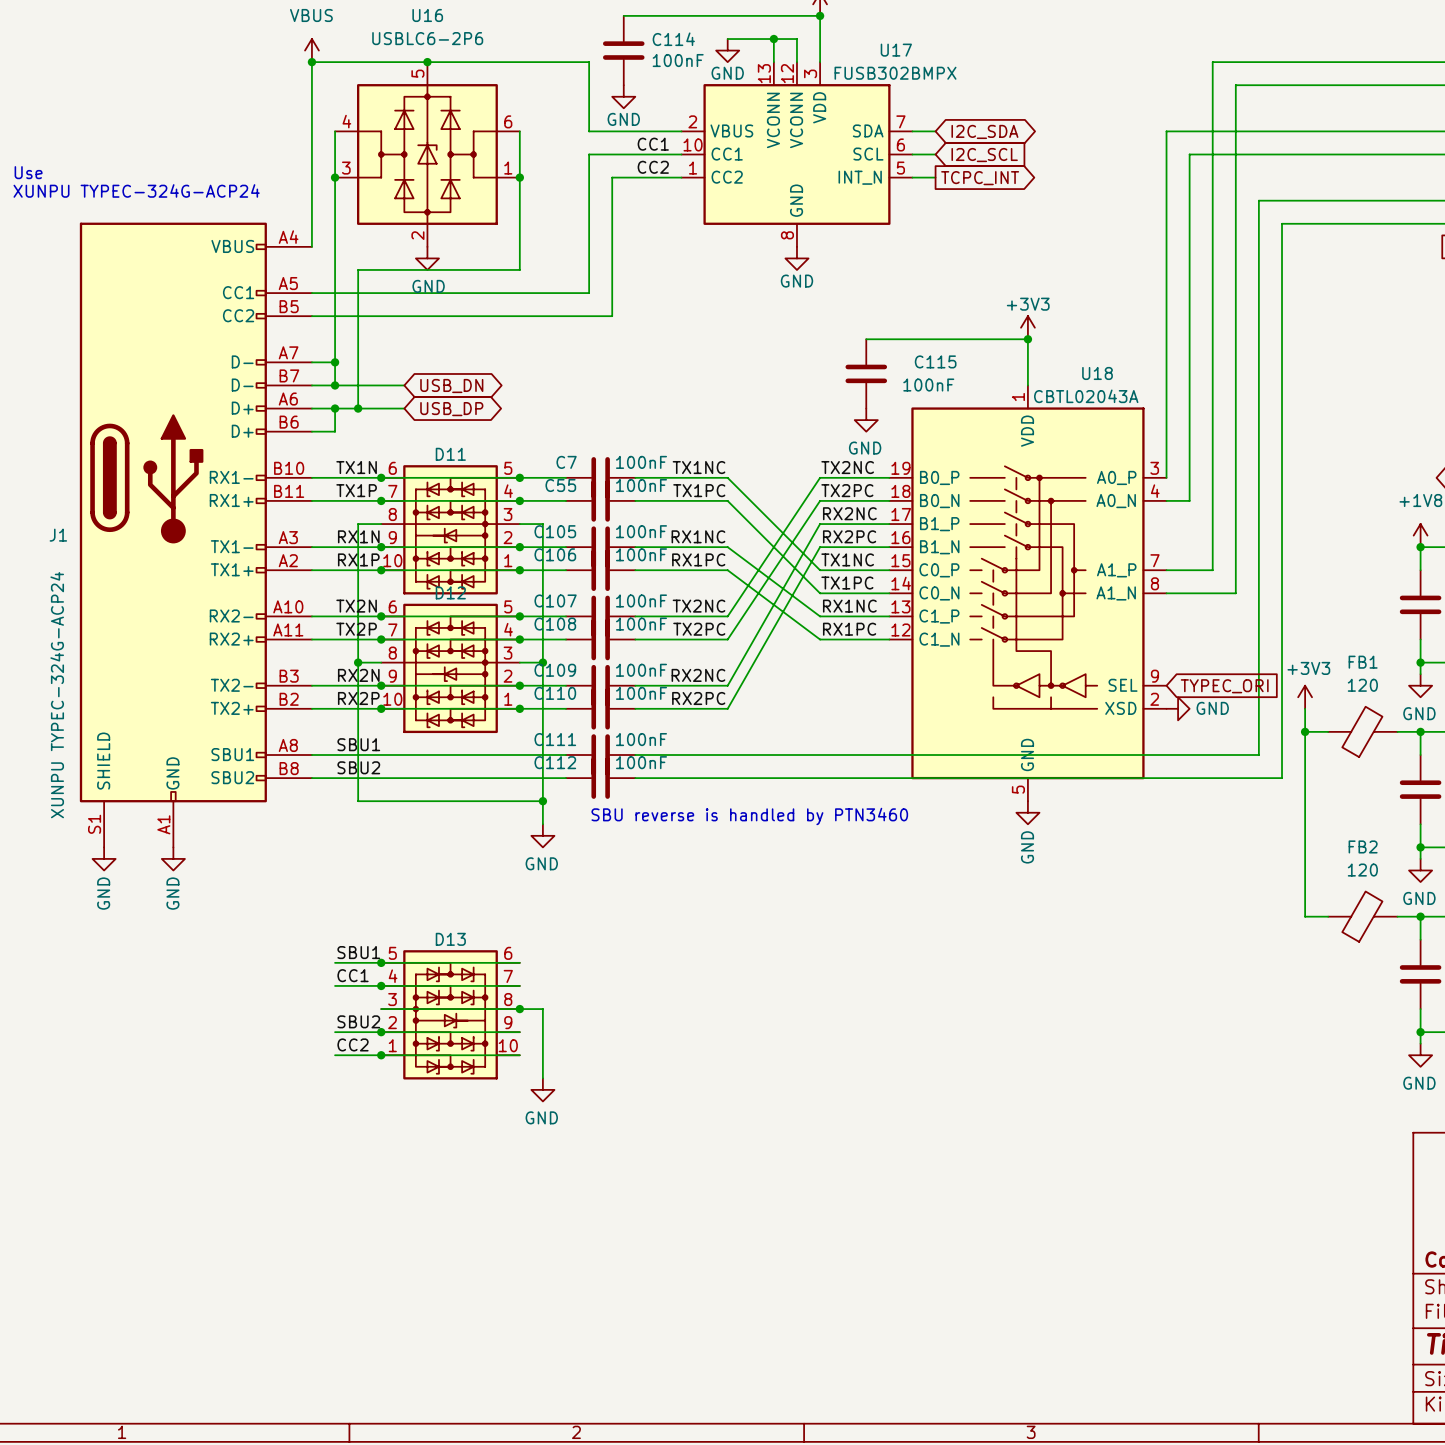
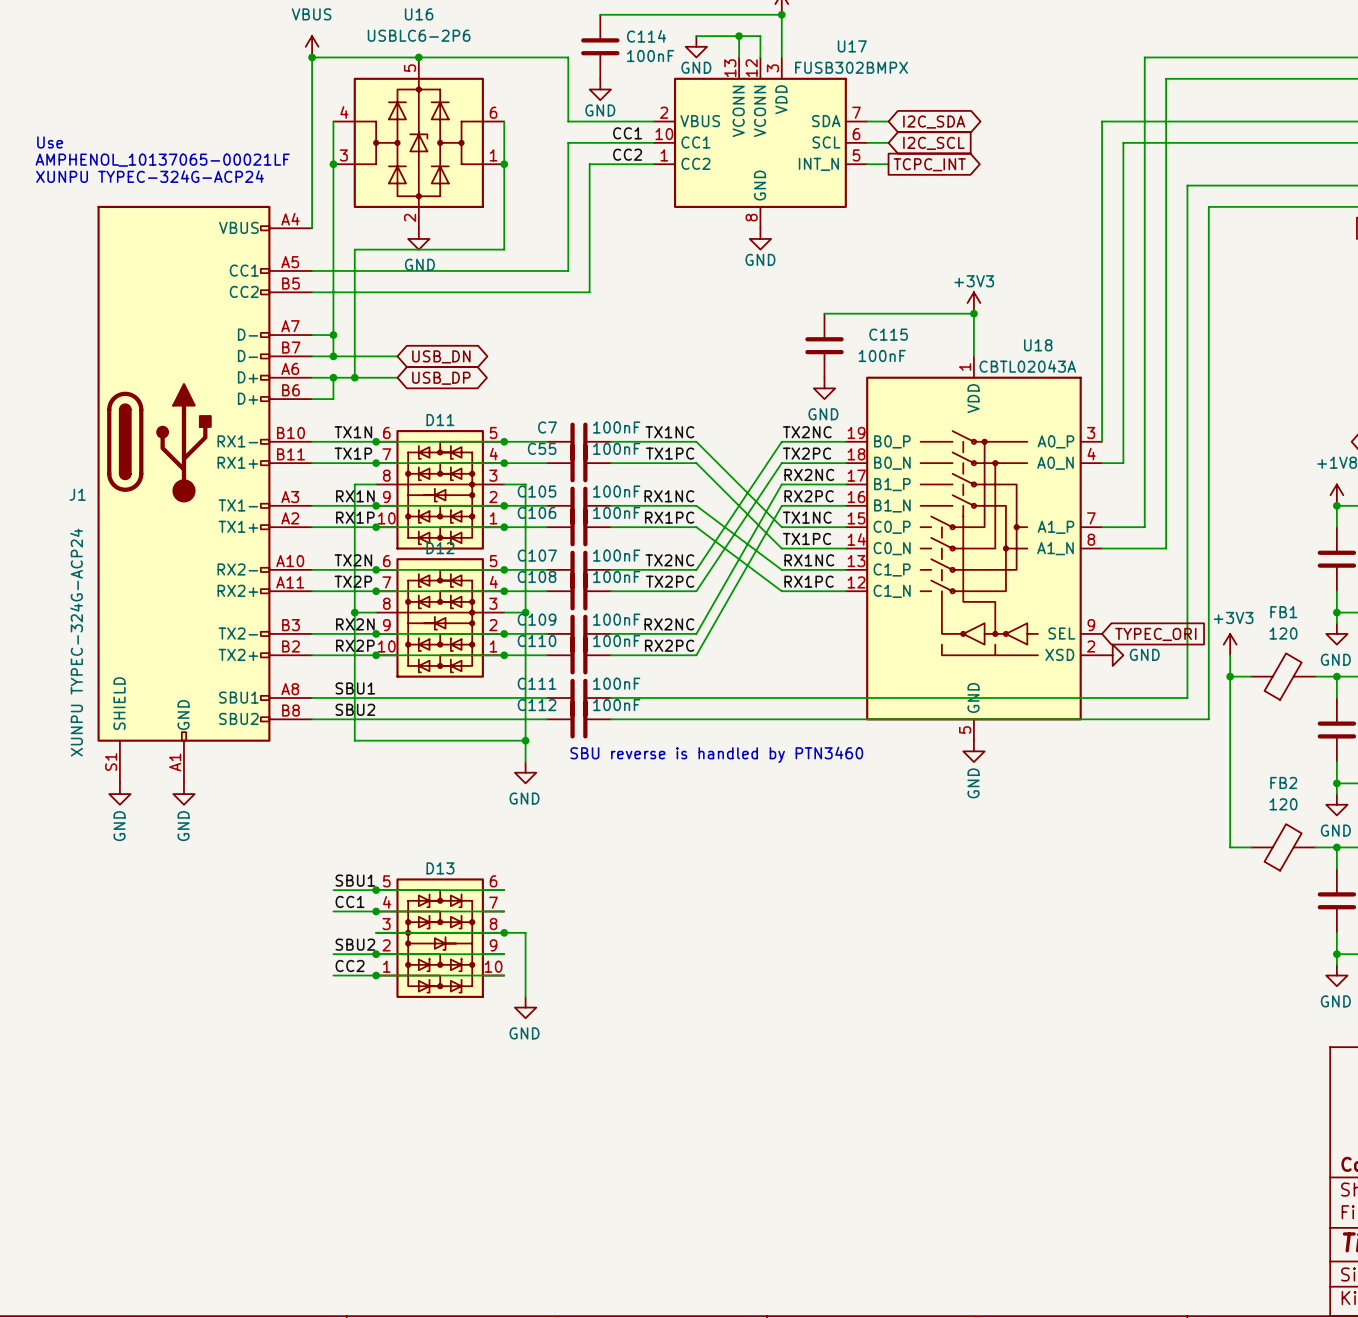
text: none -> Use (50, 142)
text: Use (28, 172) -> AMPHENOL_10137065-00021LF (162, 160)

